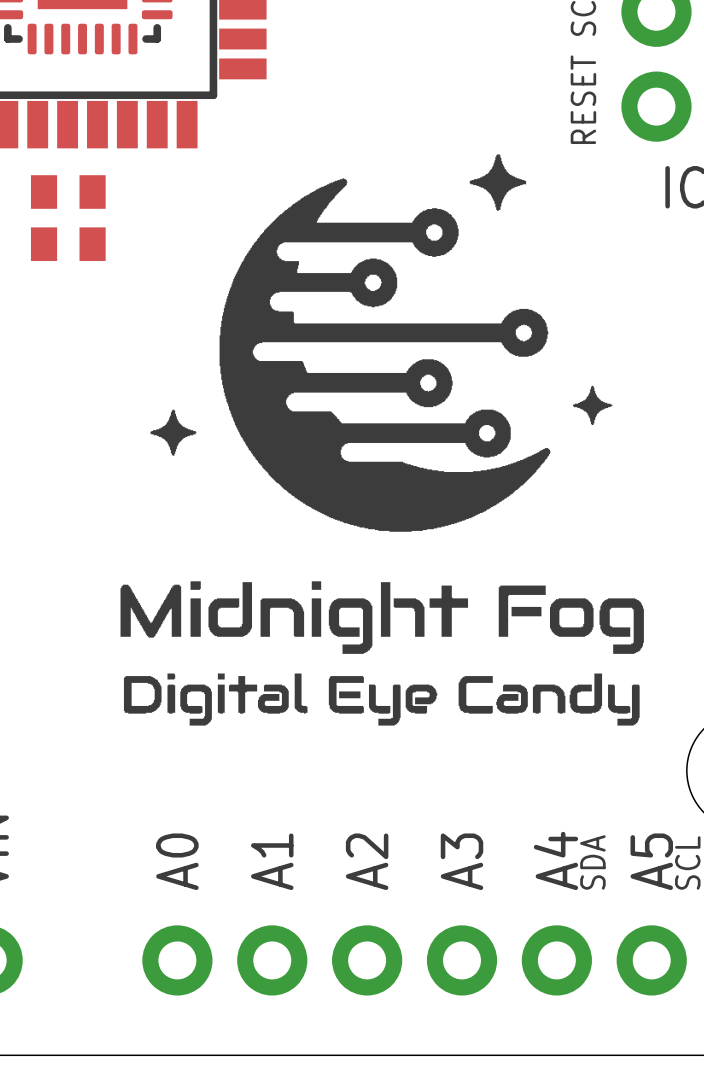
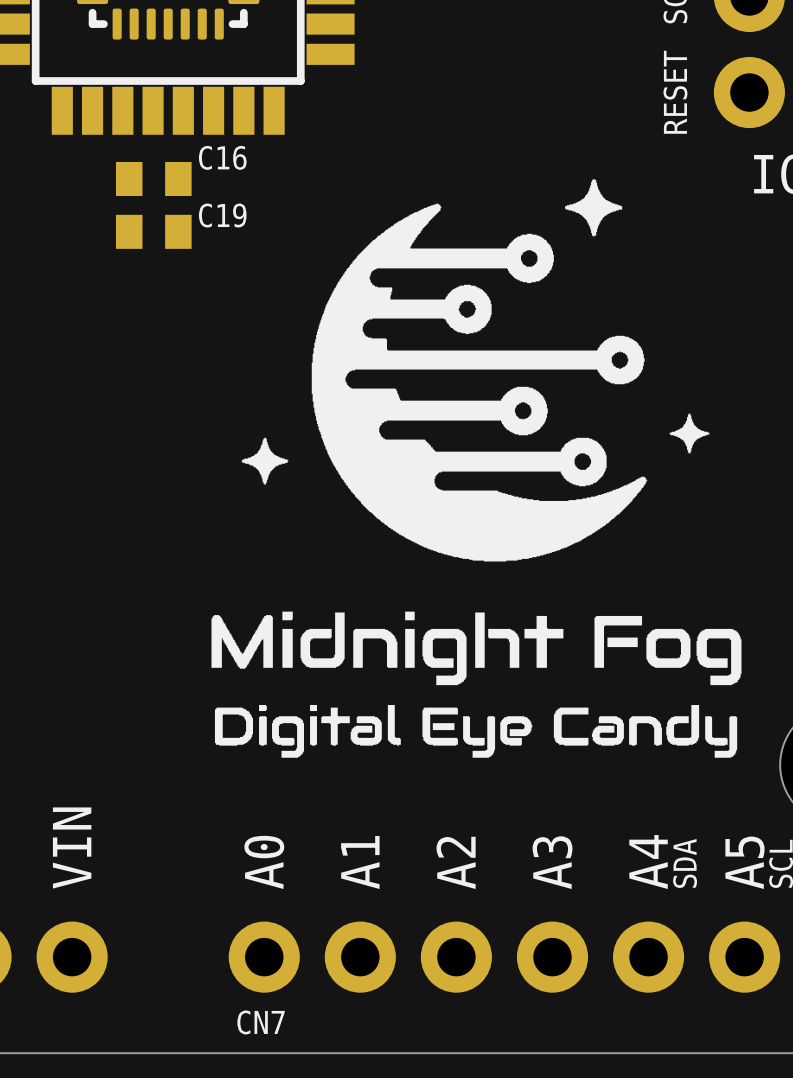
C16 name: none -> C16 (222, 157)
C19 name: none -> C19 (222, 215)
drawing position: (382, 439) -> (476, 468)
CN7 name: none -> CN7 (261, 1022)

